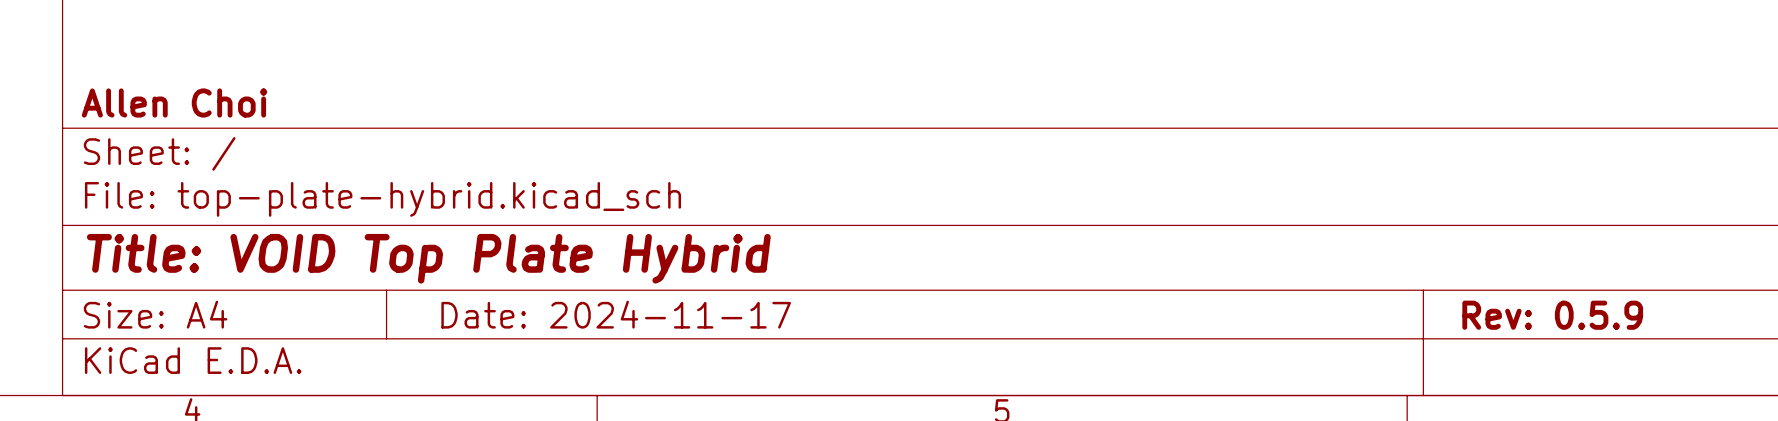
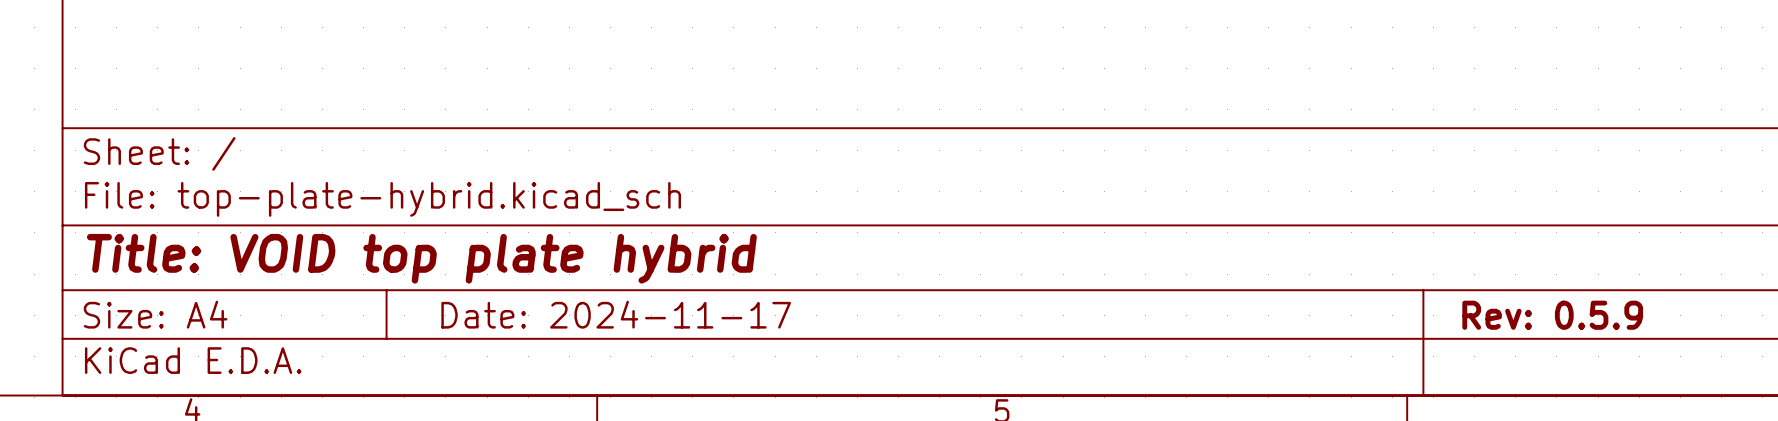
title block: Allen Choi (174, 103) -> none
title block: Title: VOID Top Plate Hybrid (428, 258) -> Title: VOID top plate hybrid (421, 258)

